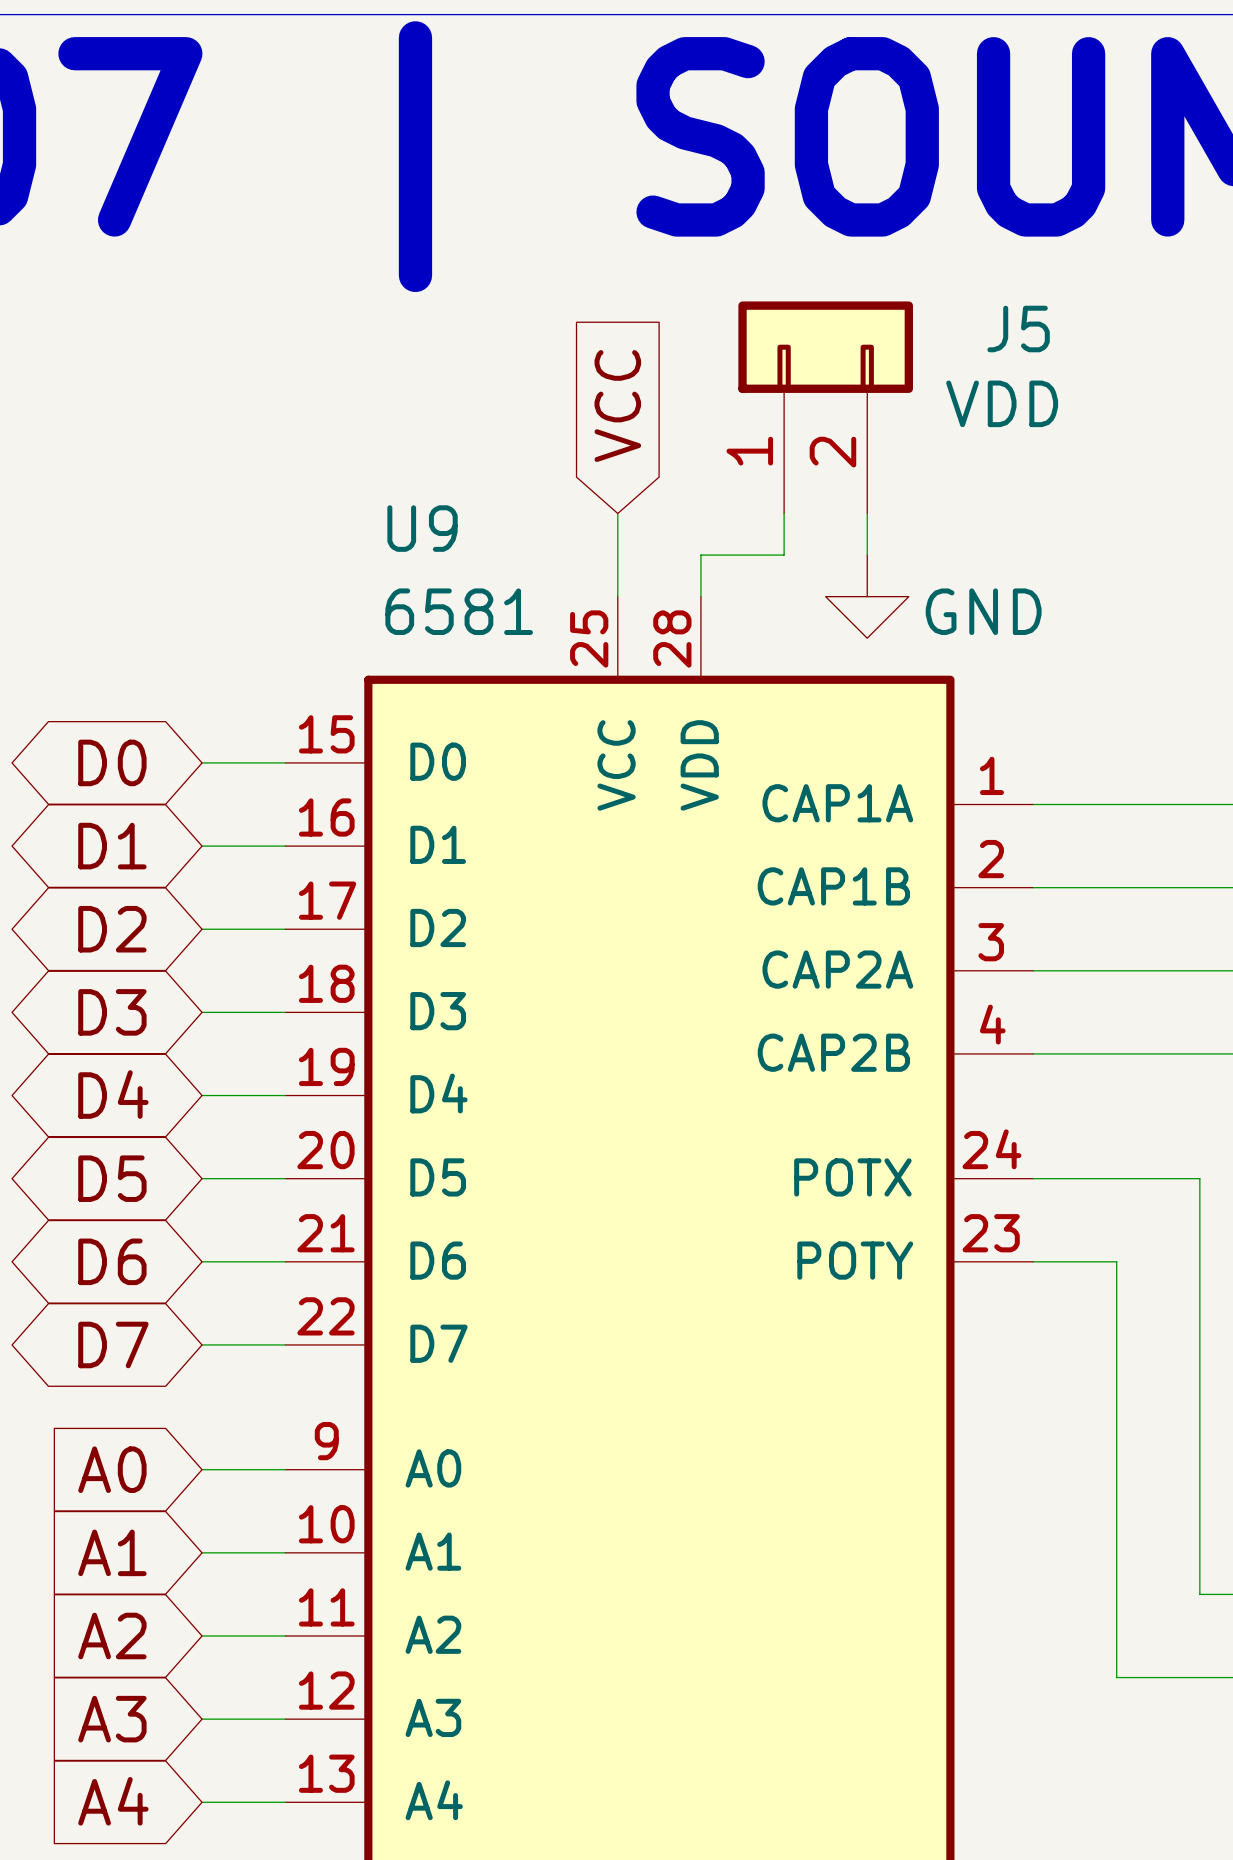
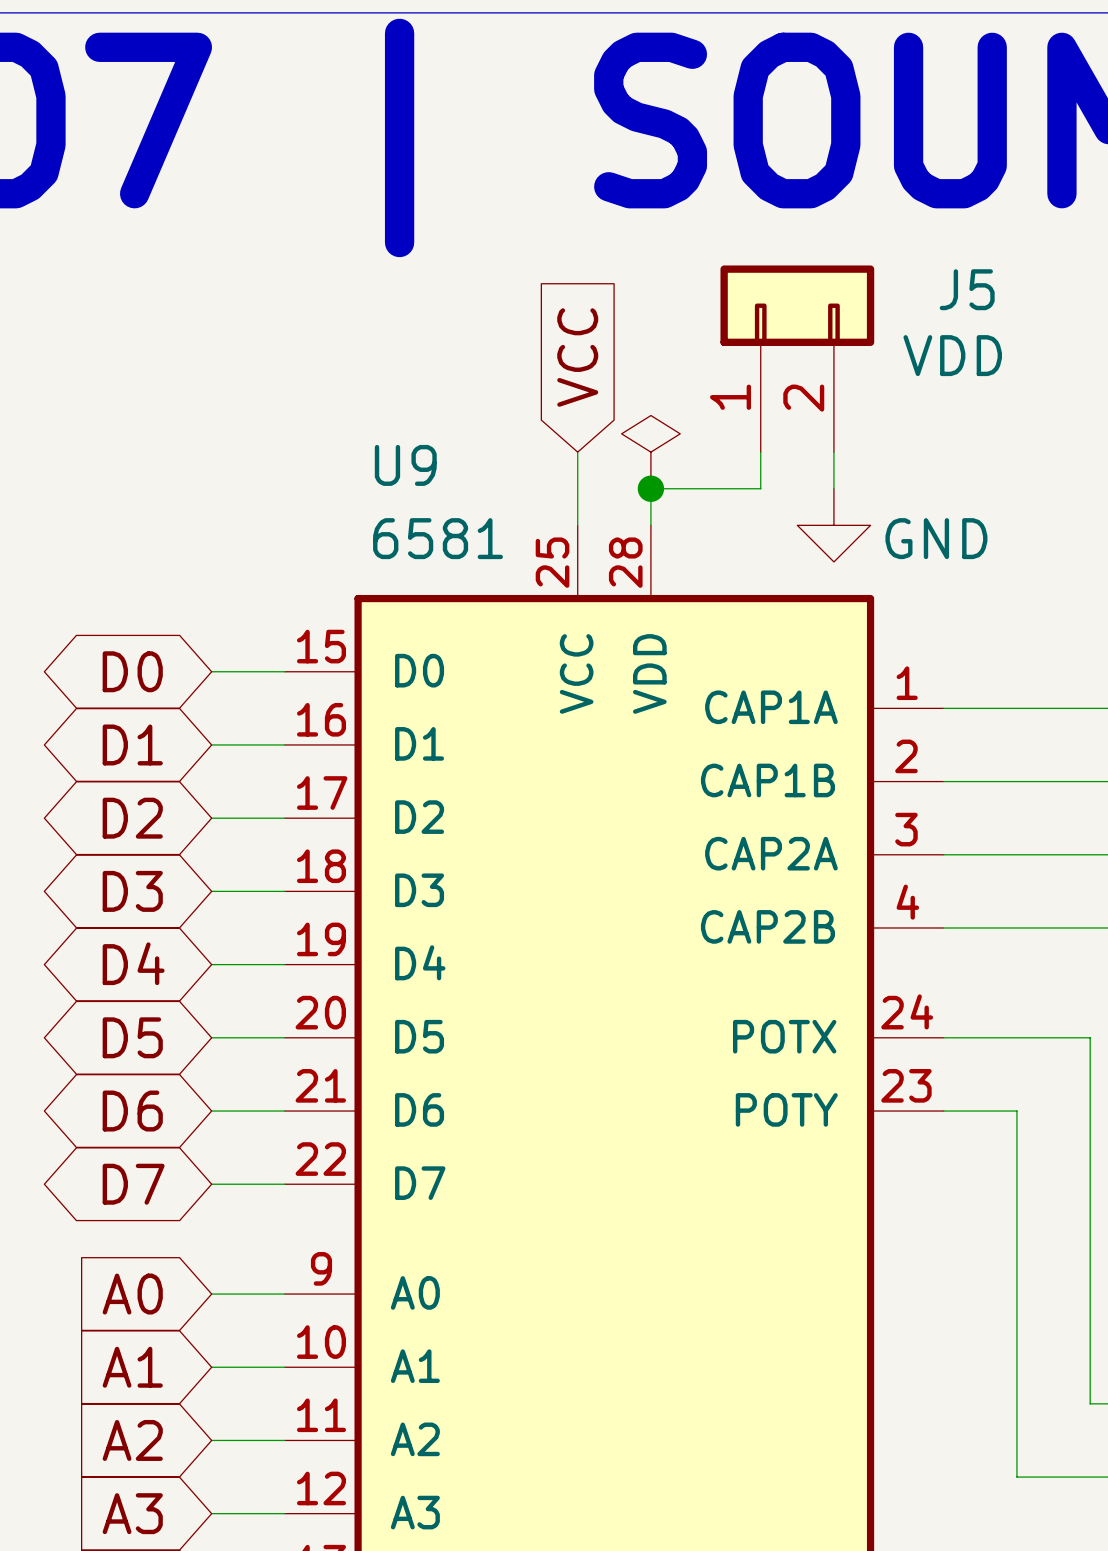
J5 position: (825, 407) -> (797, 358)
power symbol: none -> (650, 452)
wire: (784, 513) (784, 555) -> (760, 452) (760, 488) (724, 488)
wire: (867, 513) (867, 555) -> (833, 452) (833, 488)
junction: none -> (650, 488)
power symbol position: GND (867, 596) -> GND (833, 525)

